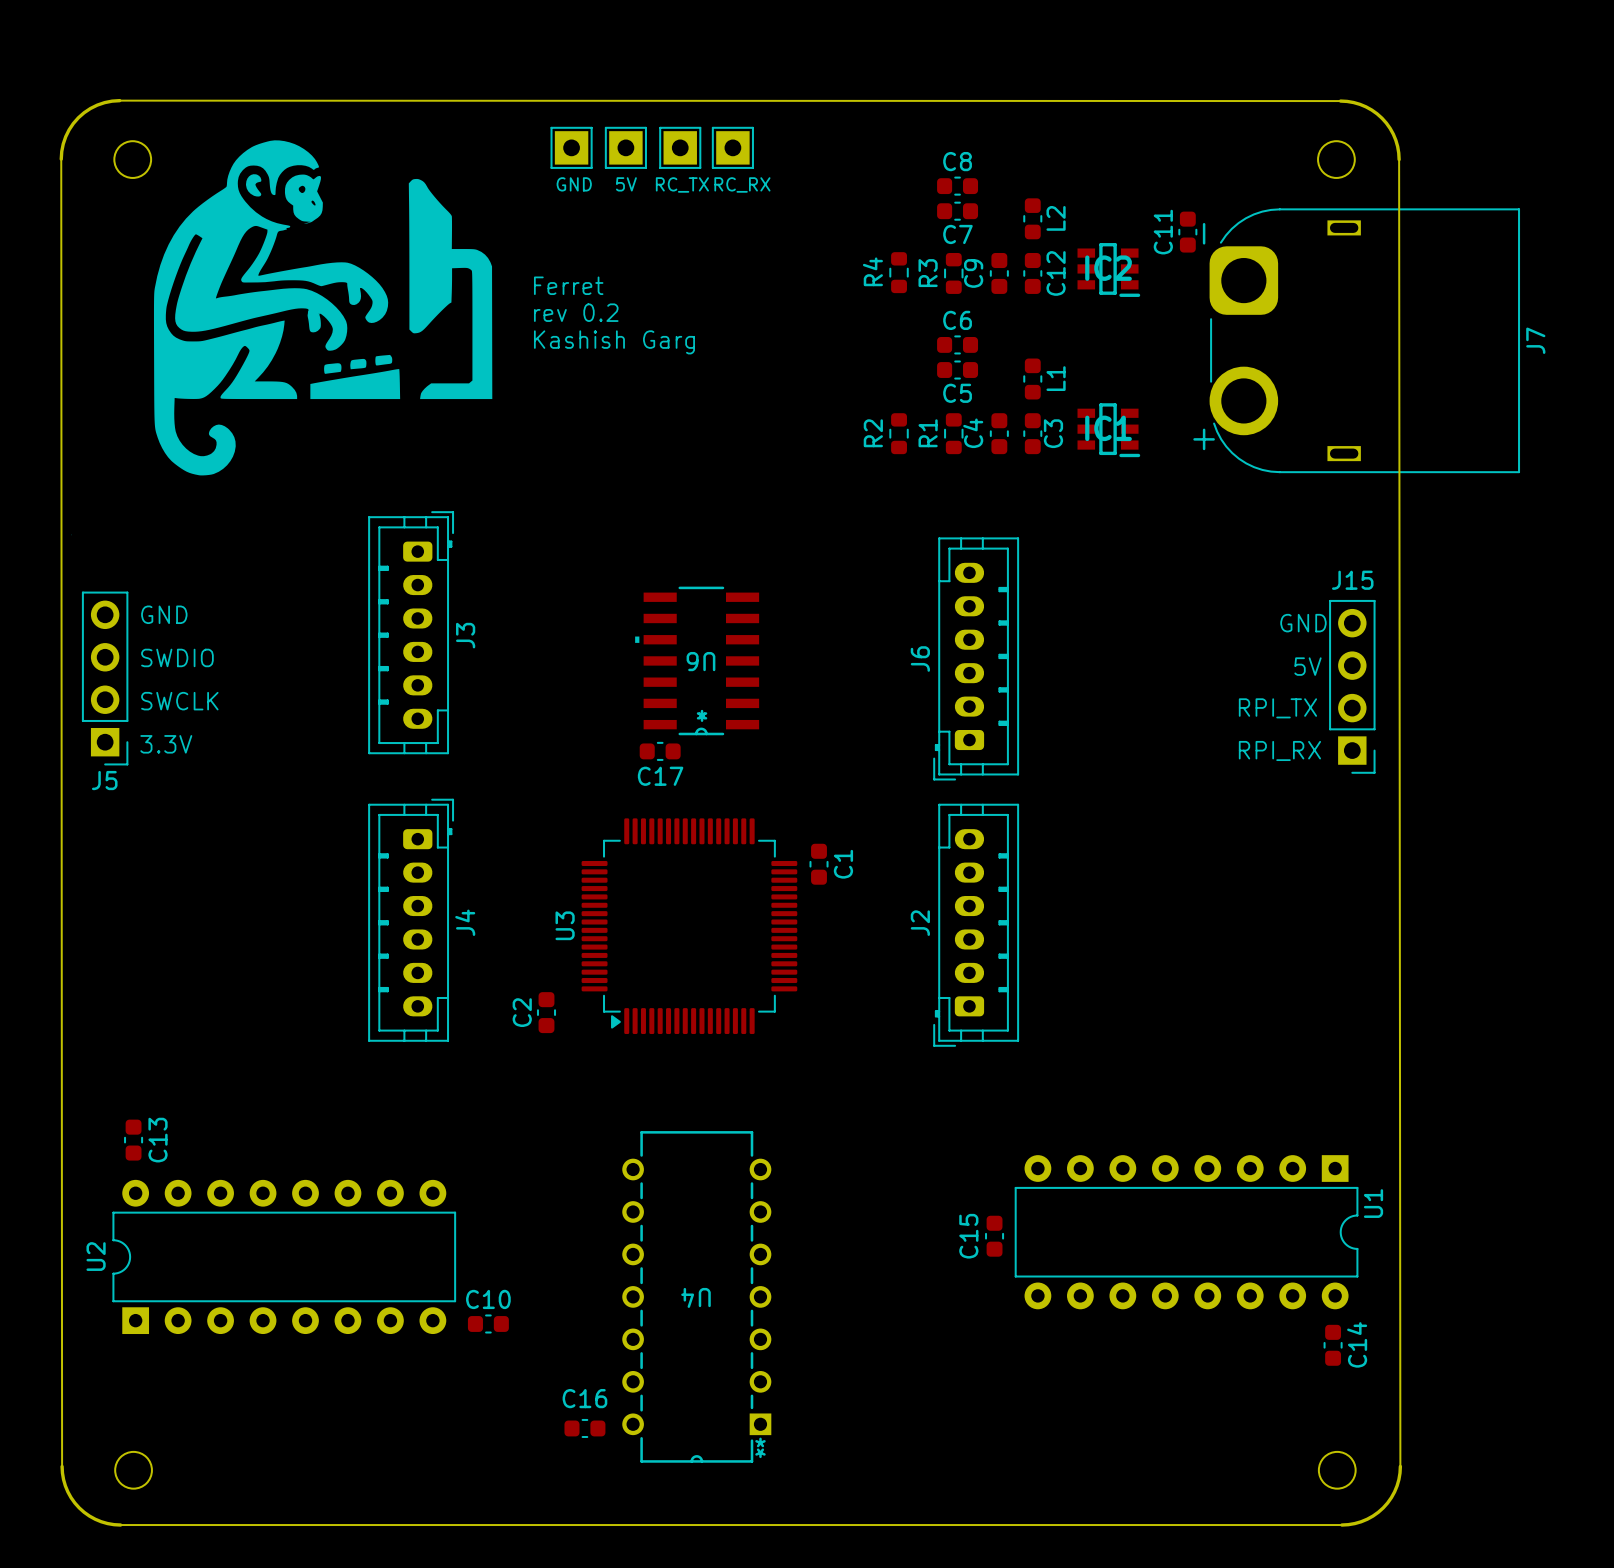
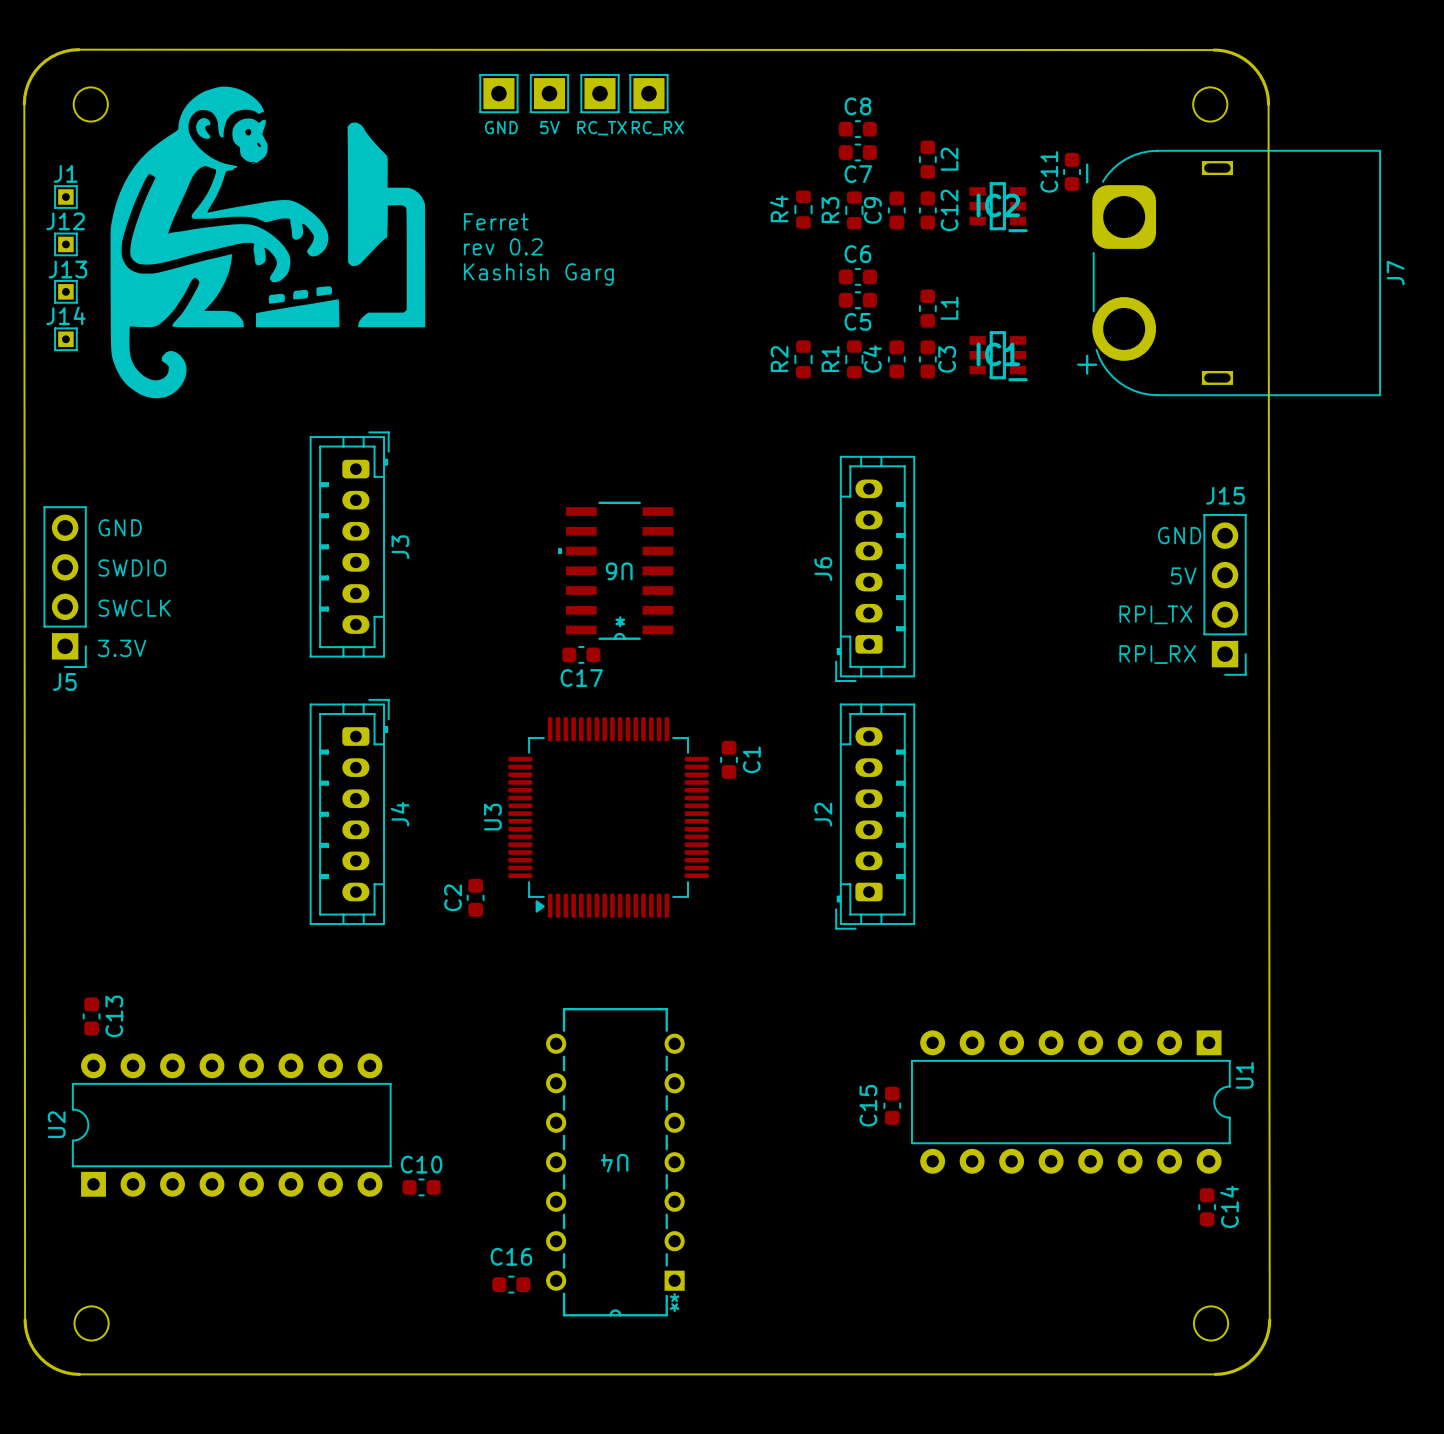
J1: none -> (65, 197)
J12: none -> (65, 244)
J13: none -> (65, 291)
J14: none -> (65, 339)

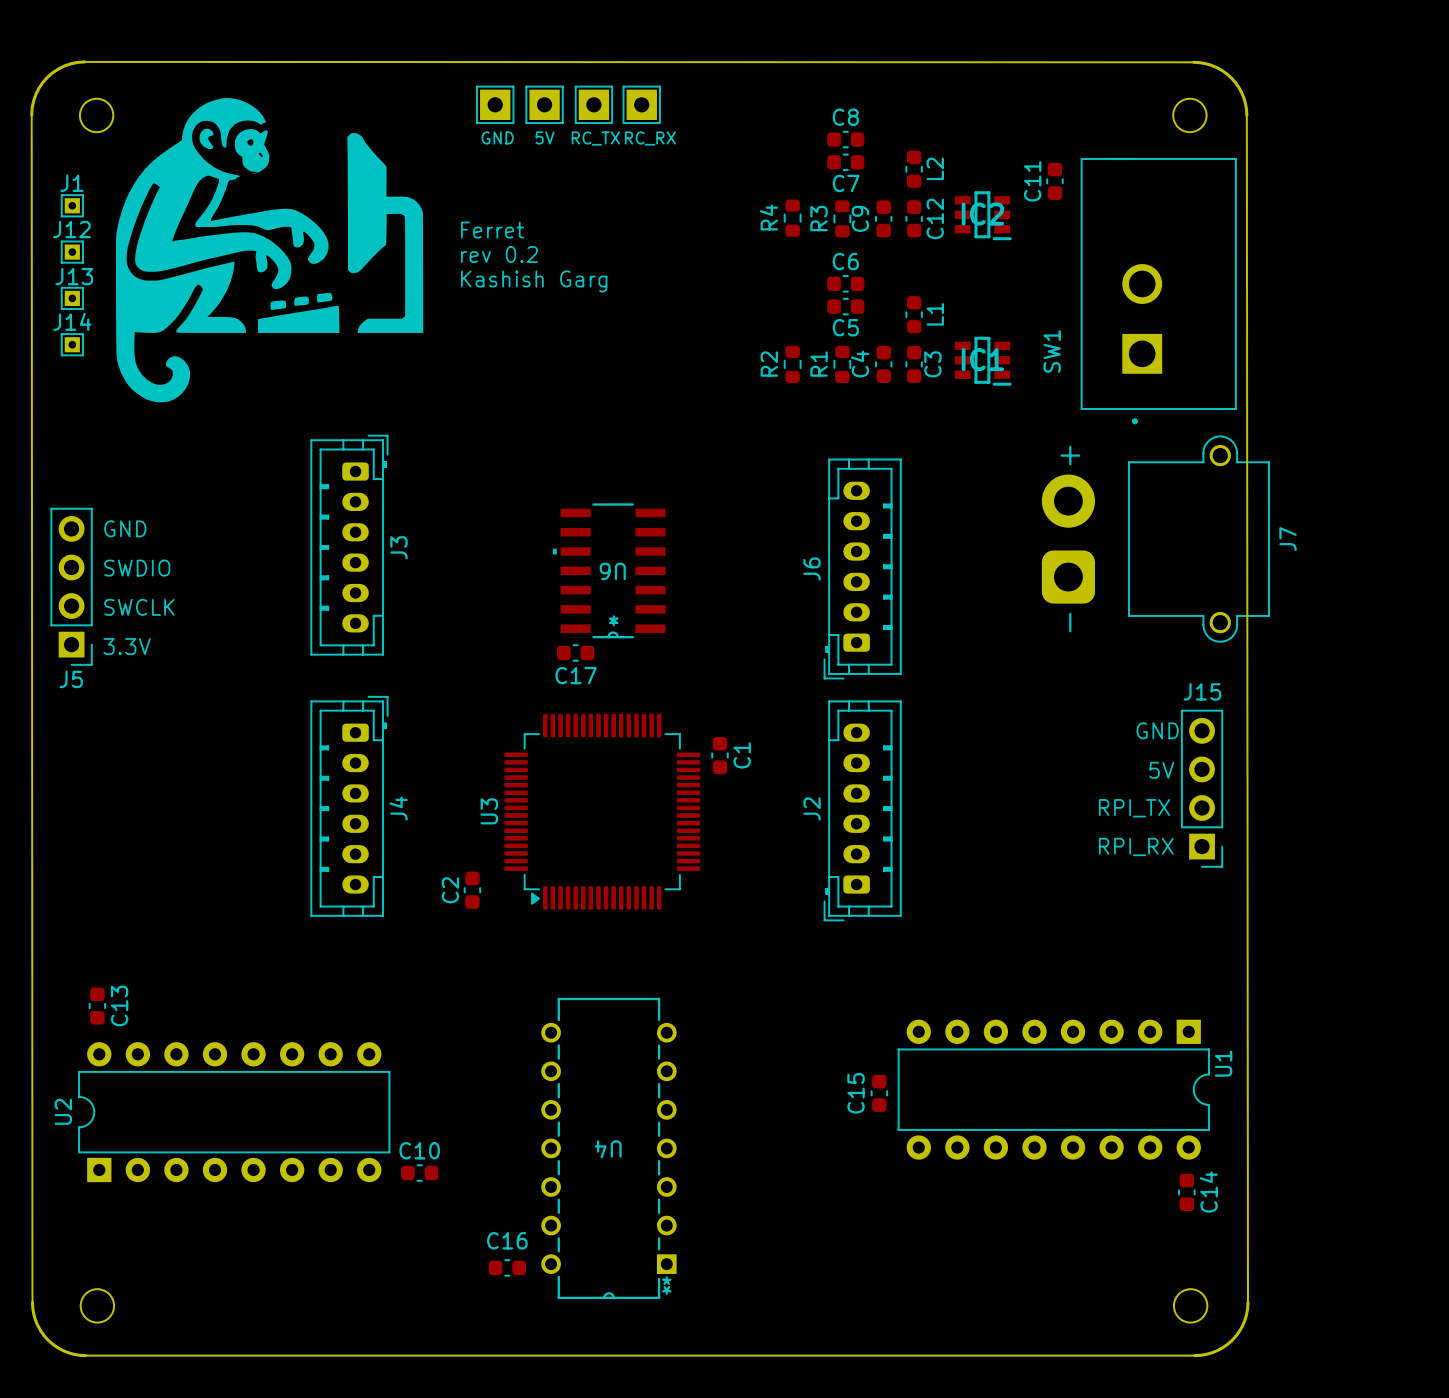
J7 footprint: [1092, 149, 1382, 397] -> [1041, 435, 1270, 643]
SW1: none -> (1158, 291)
text position: GND (1179, 535) -> GND (1157, 730)
text position: 5V (1183, 576) -> 5V (1161, 770)
J15 position: (1225, 594) -> (1202, 788)
text position: RPI_TX (1155, 614) -> RPI_TX (1134, 808)
text position: RPI_RX (1157, 654) -> RPI_RX (1136, 846)

